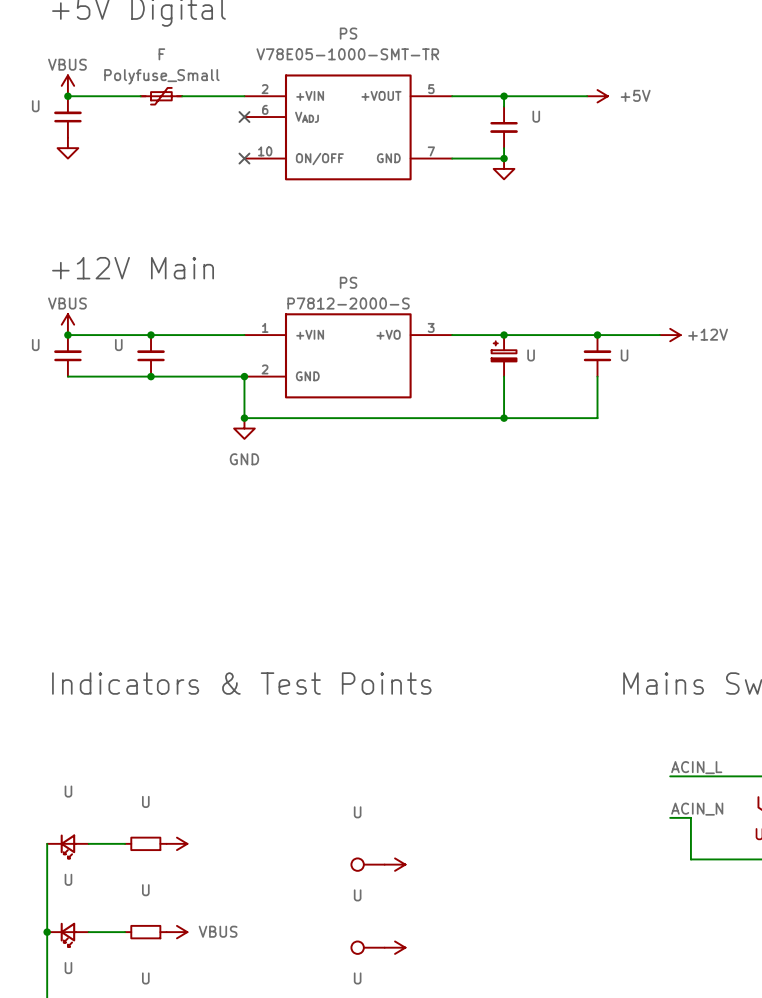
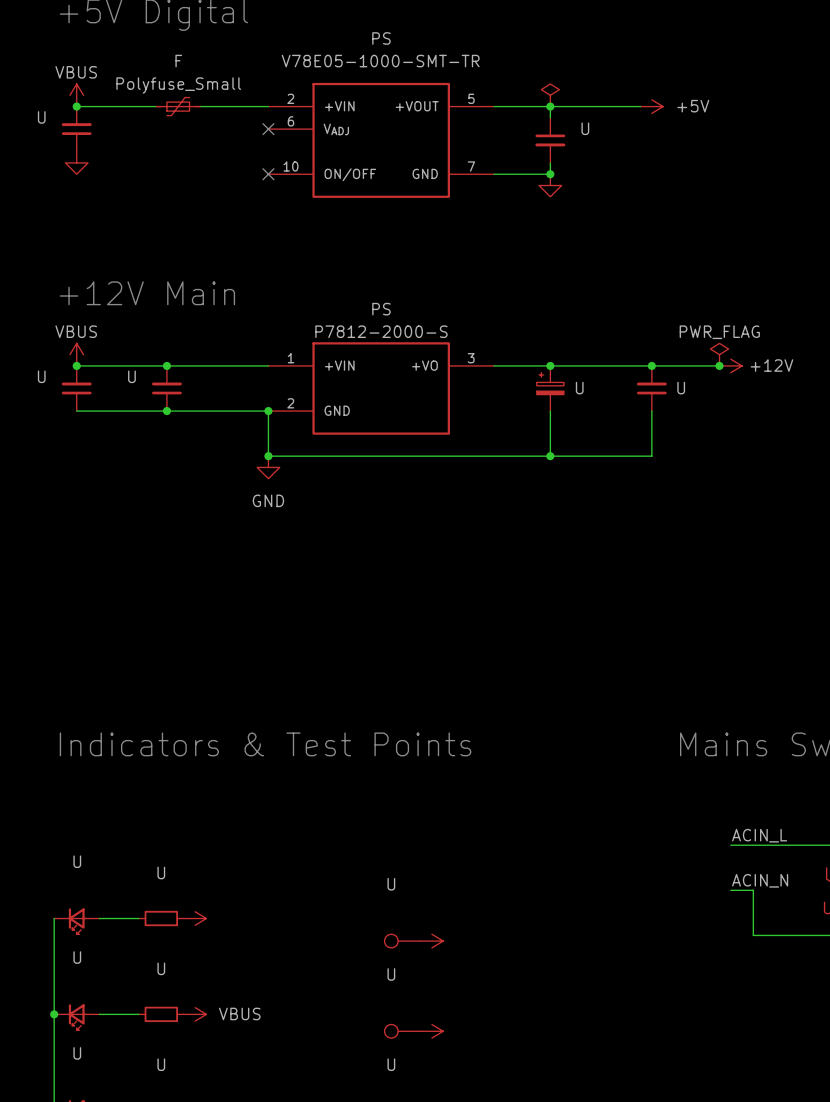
power symbol: none -> (550, 95)
power symbol: none -> PWR_FLAG (719, 354)
junction: none -> (719, 365)

